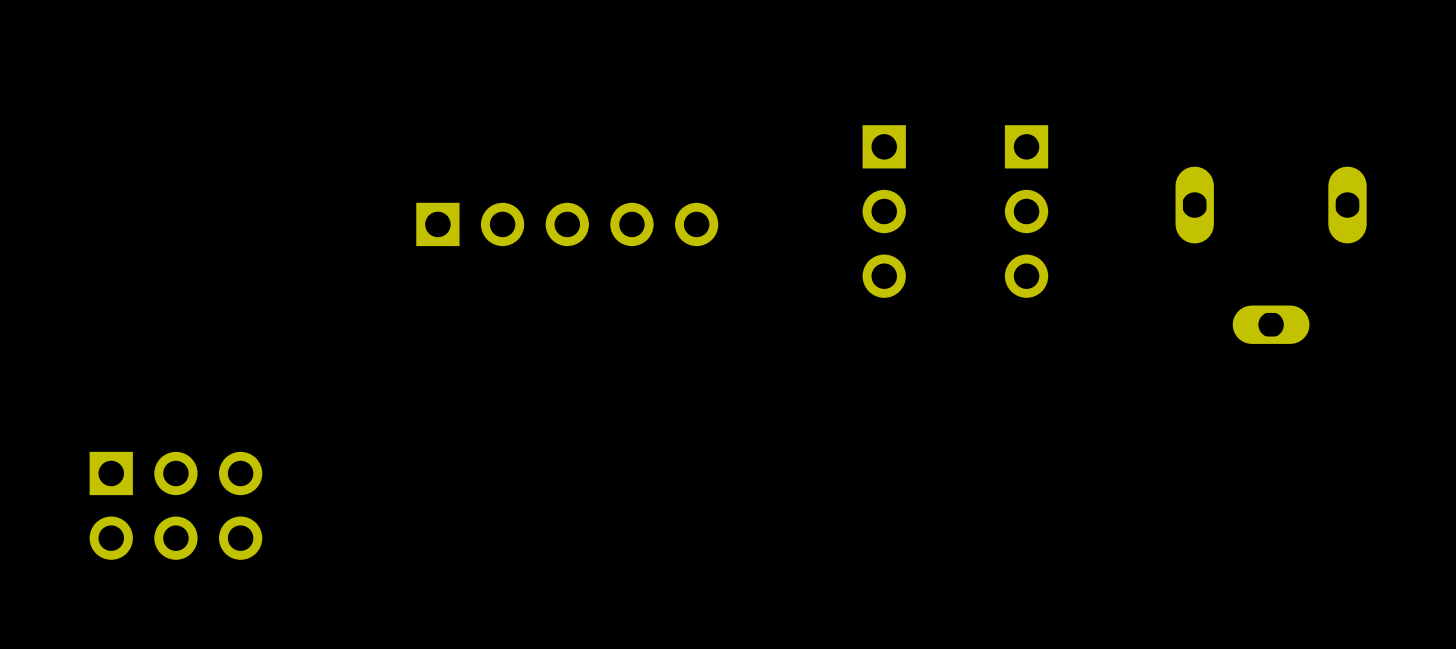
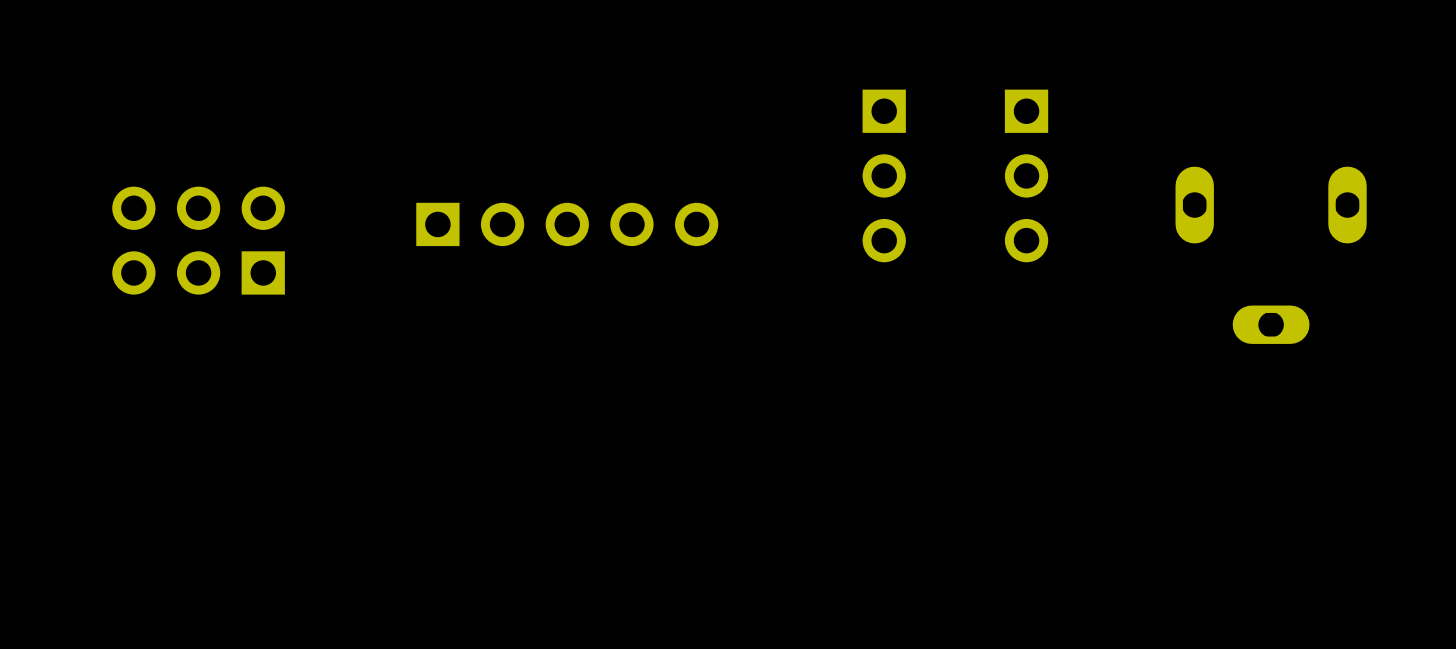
part position: (884, 211) -> (884, 175)
part position: (1026, 211) -> (1026, 175)
part rotation: 0° (175, 505) -> 180° (198, 240)
part position: (175, 505) -> (198, 240)

